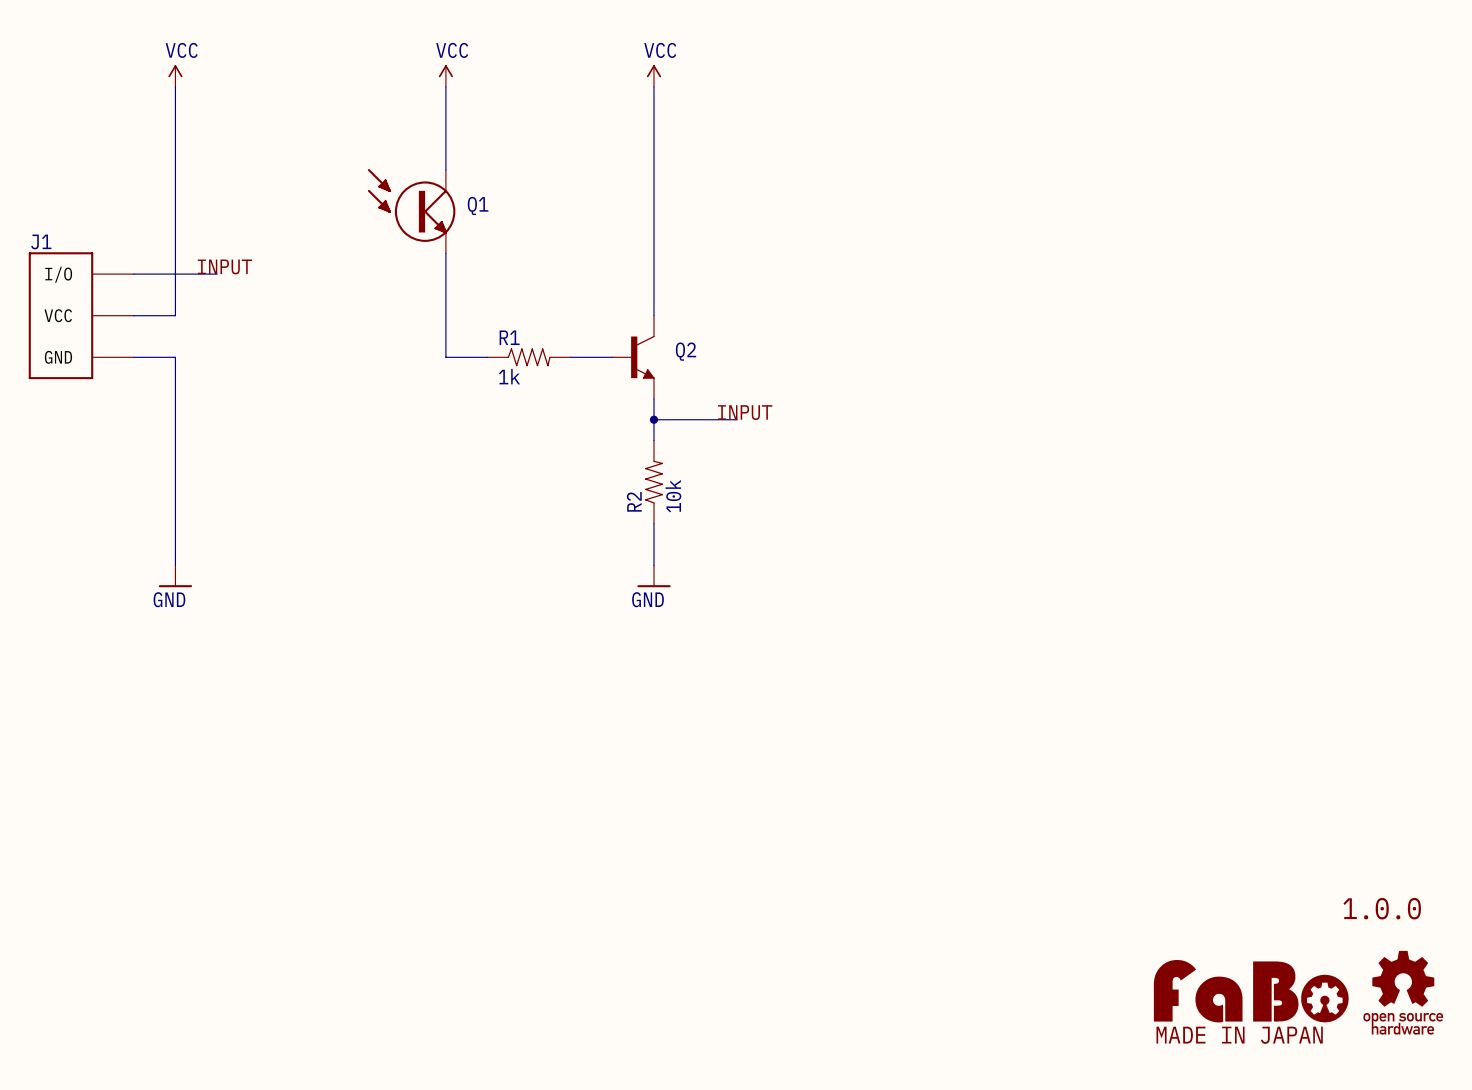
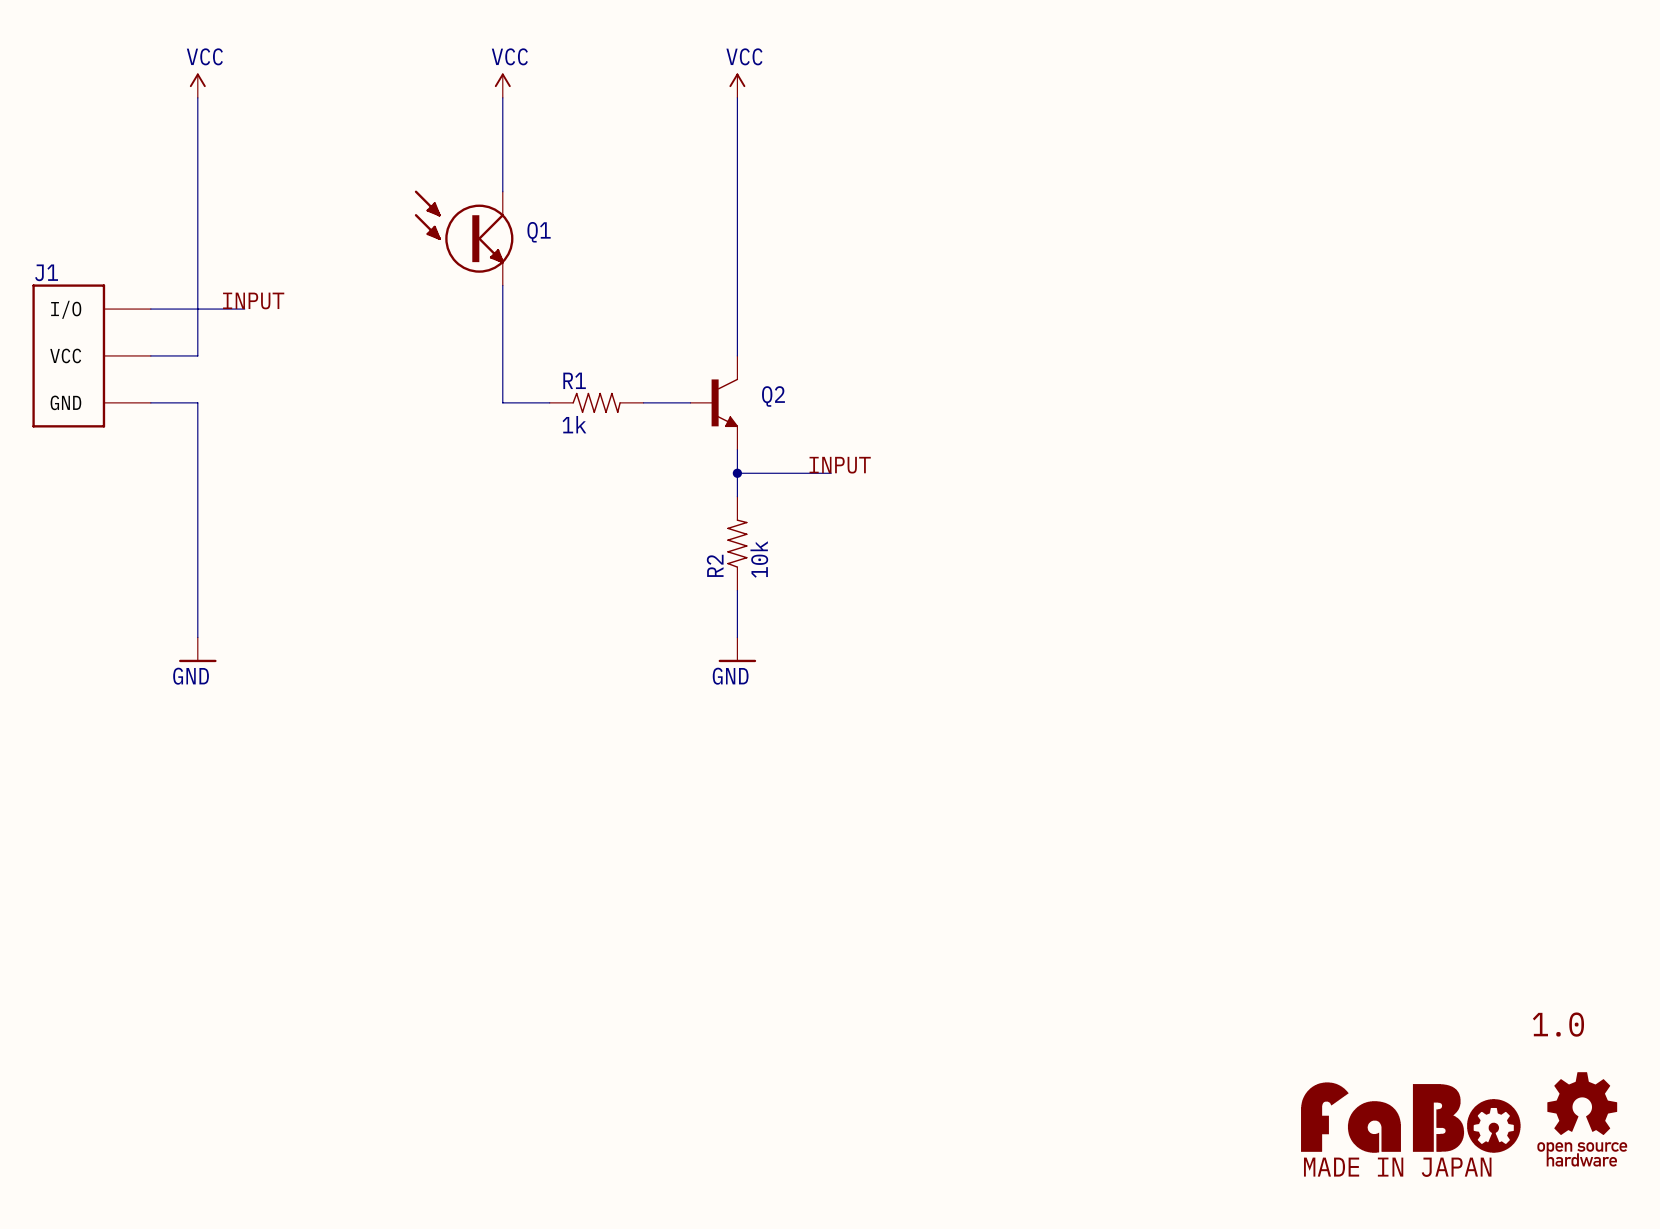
text: 1.0.0 (1382, 908) -> 1.0 (1558, 1024)

